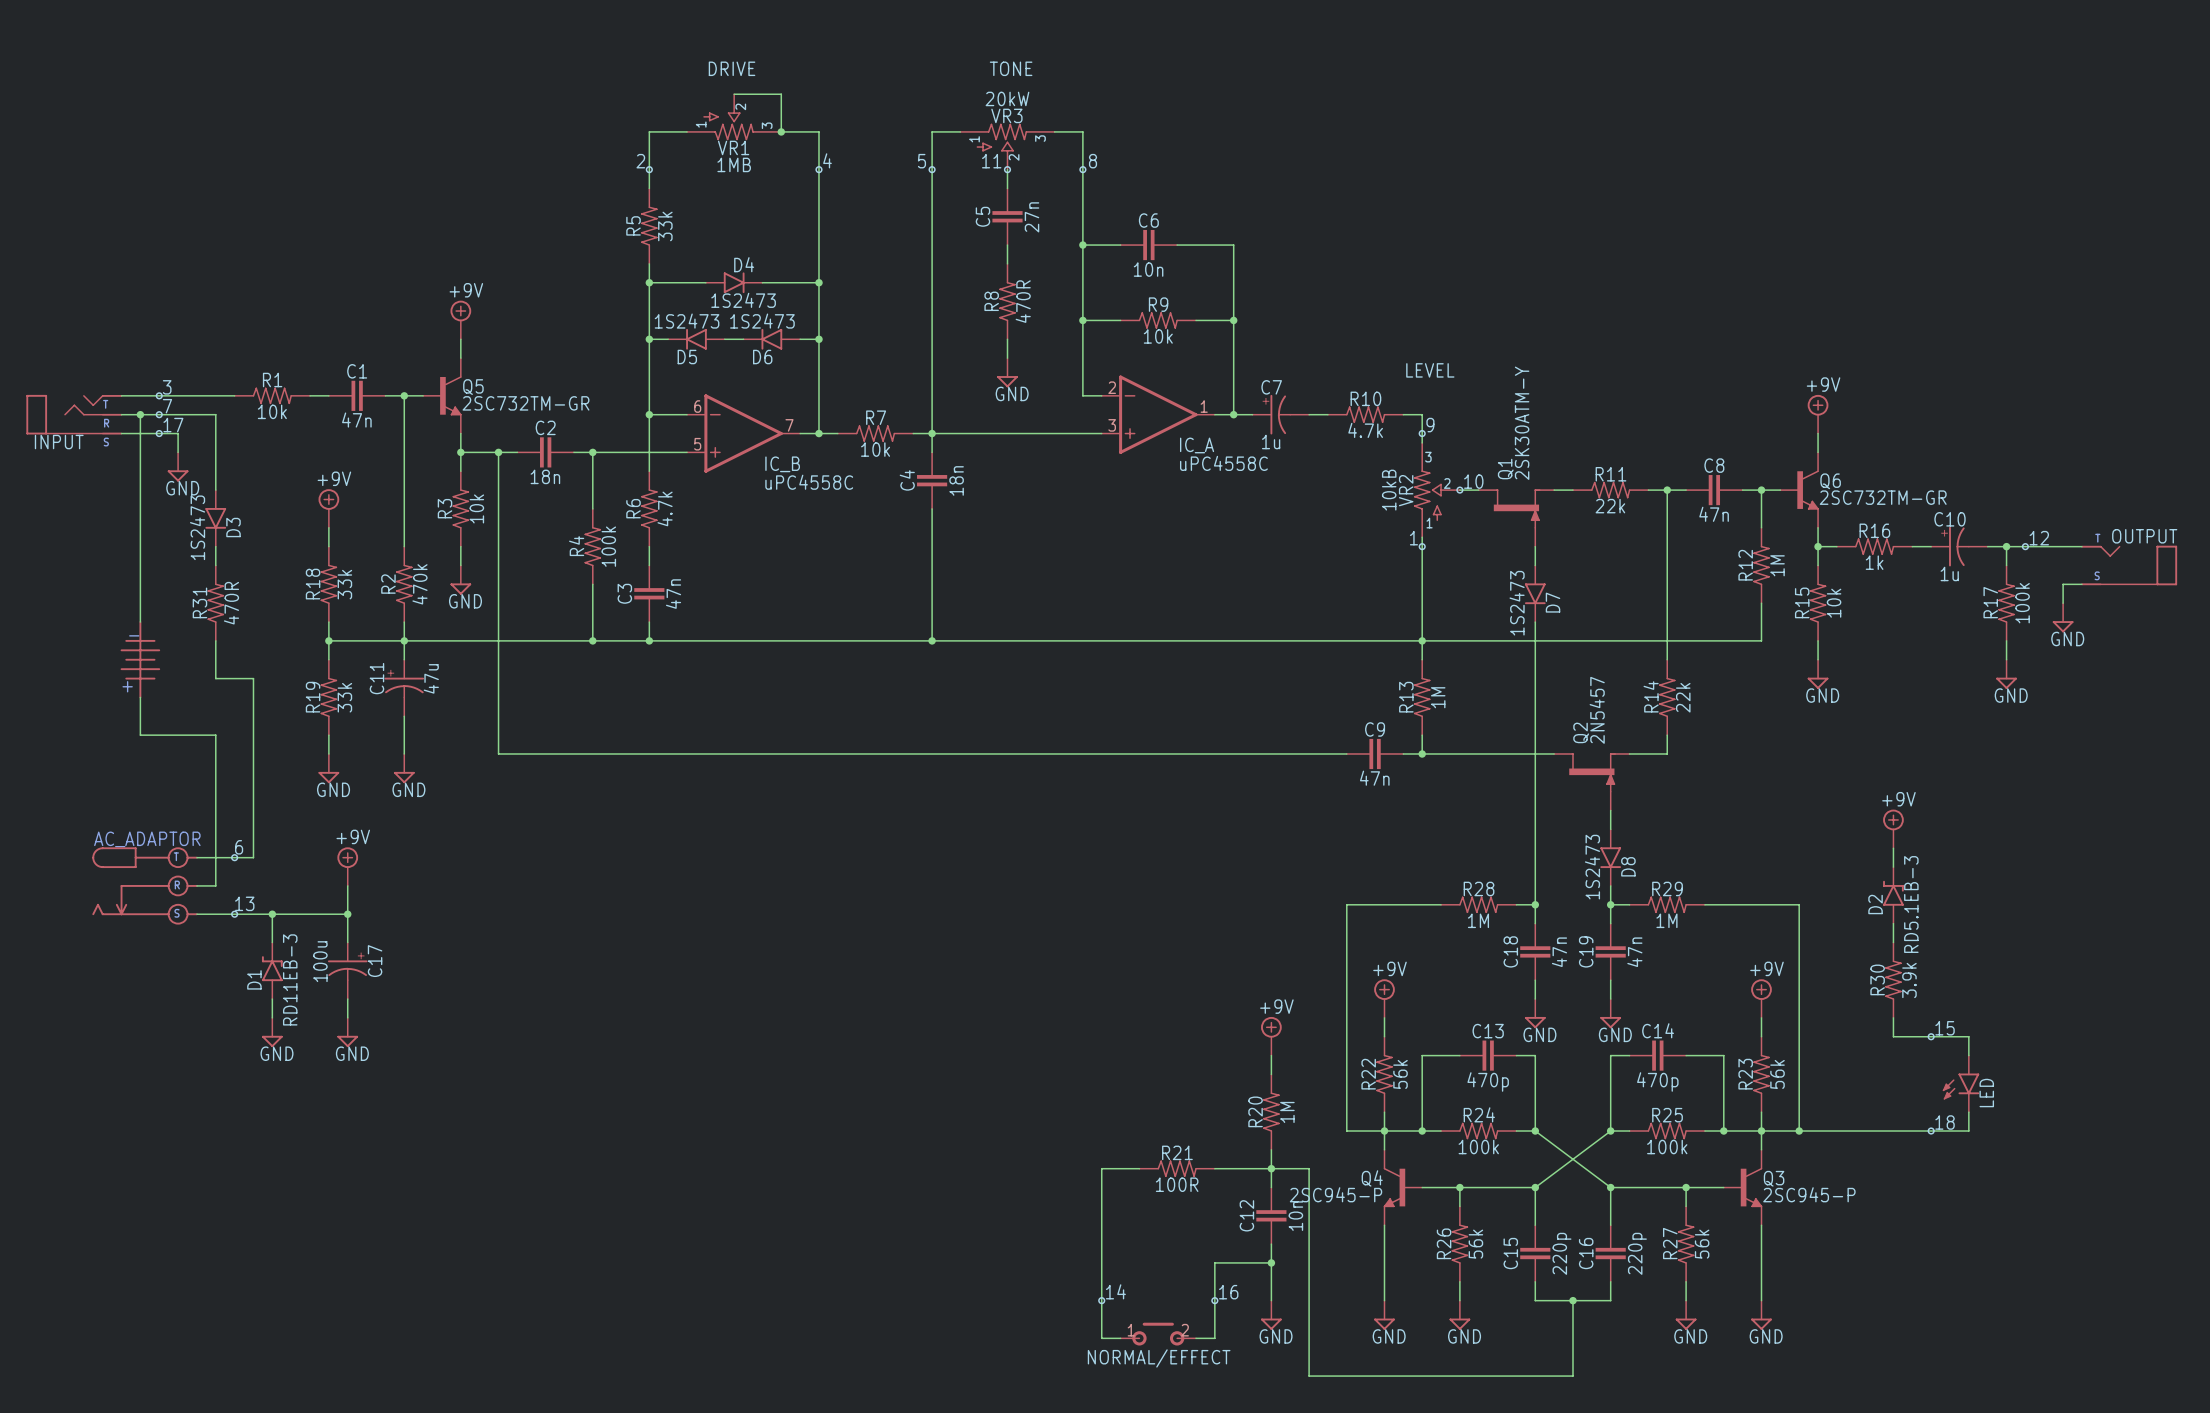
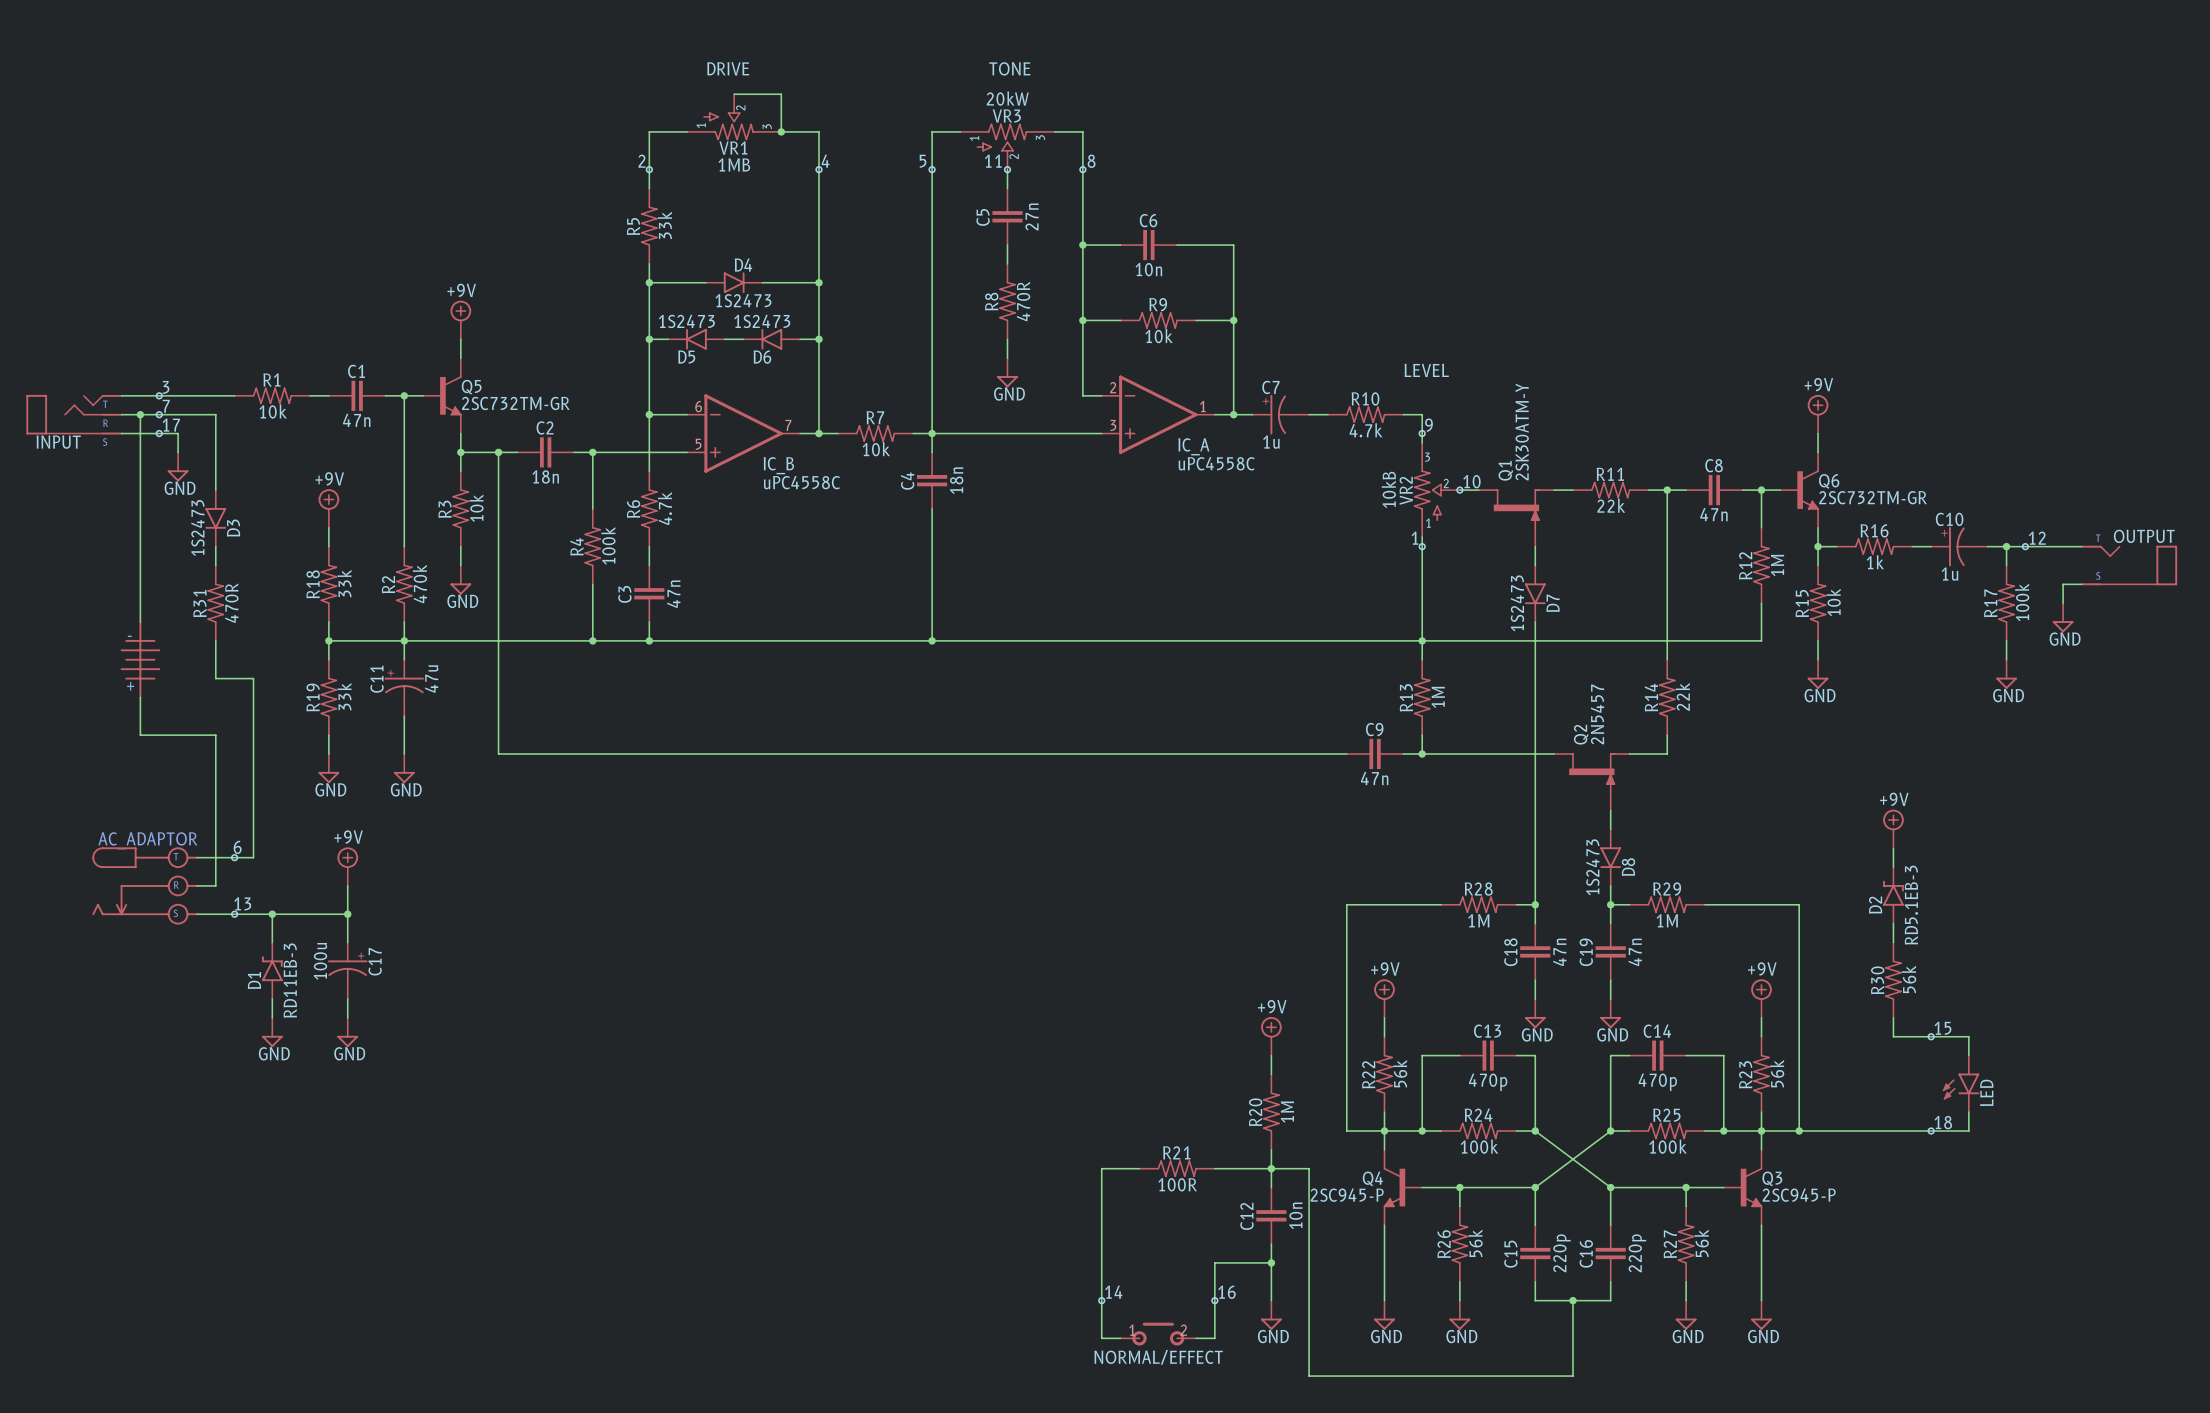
R30 value: 3.9k (1909, 980) -> 56k (1909, 979)

